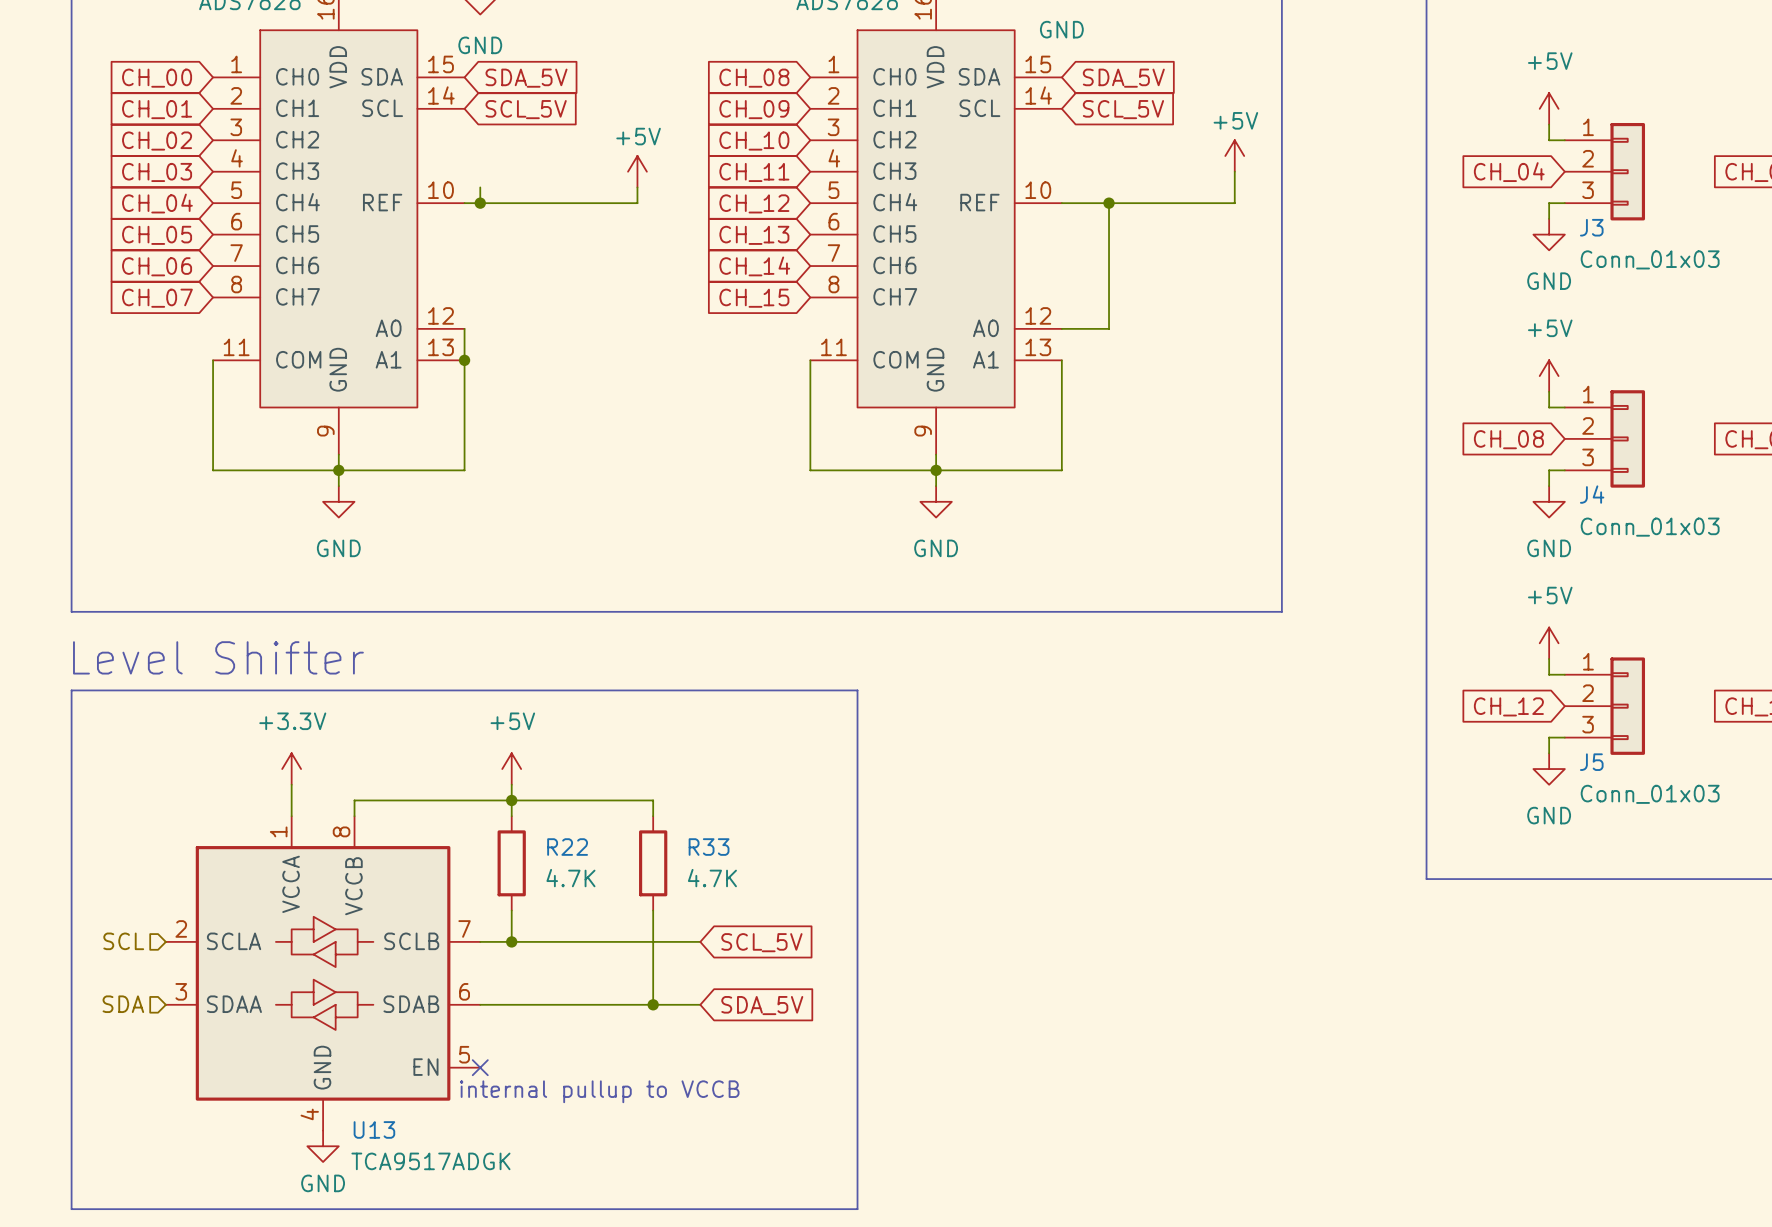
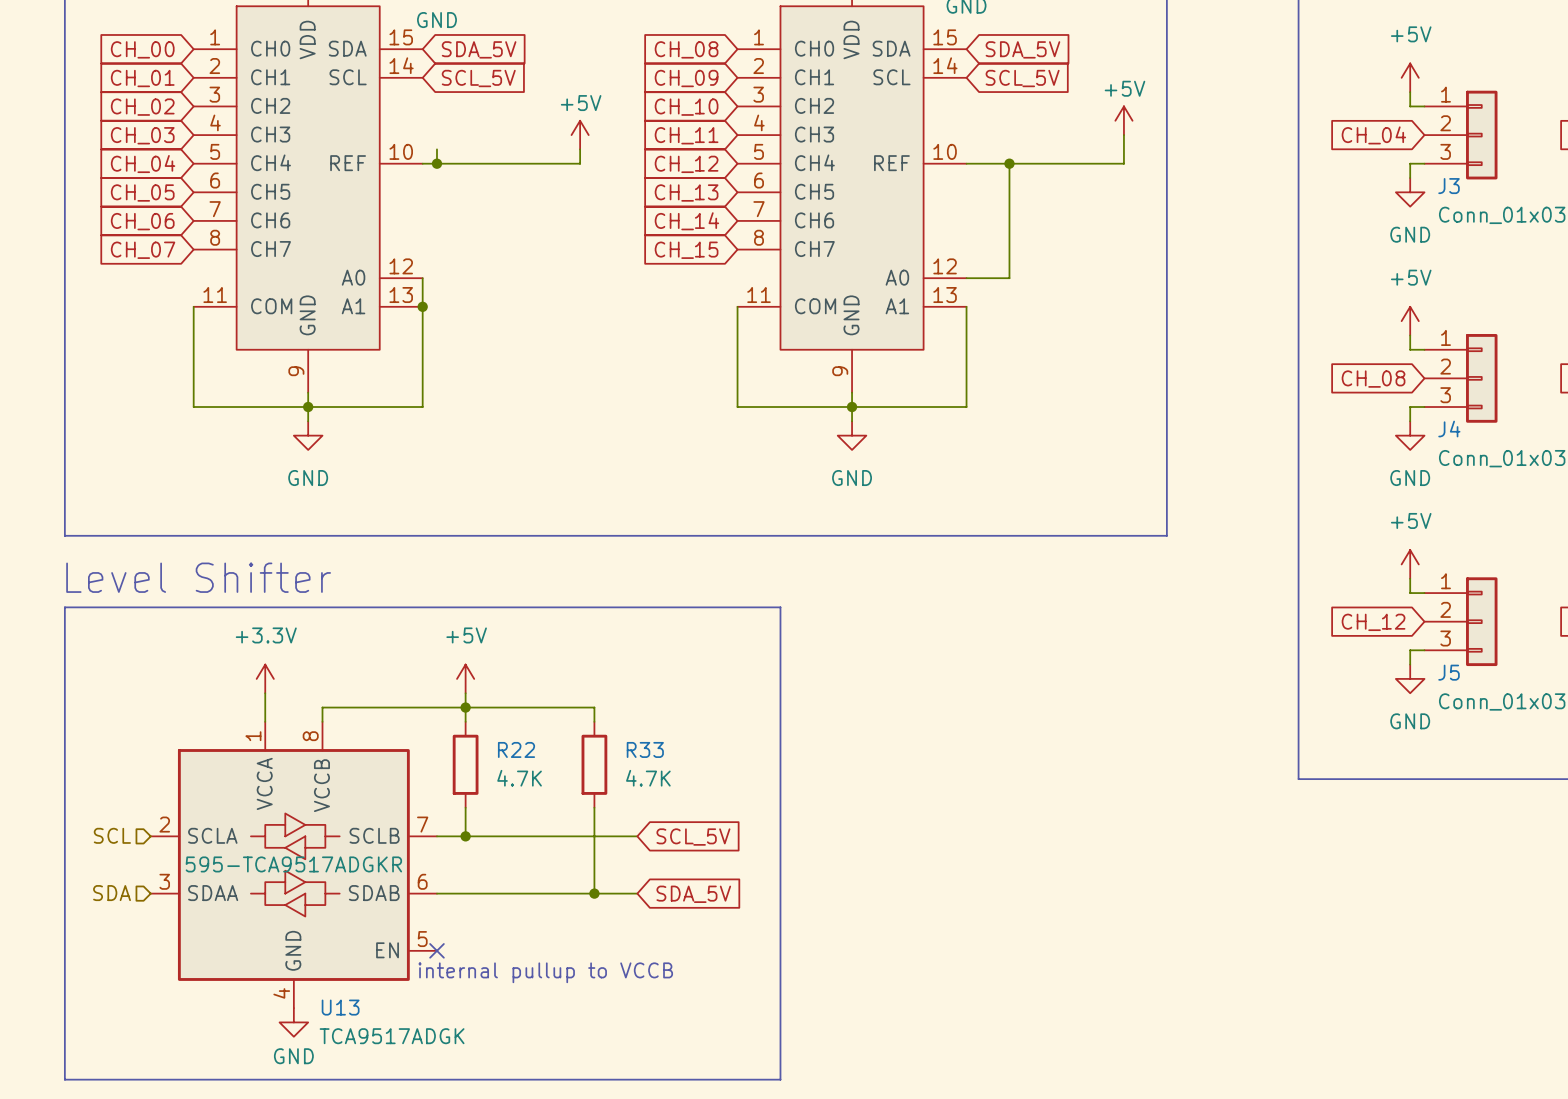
U13 text: none -> 595-TCA9517ADGKR (293, 864)

